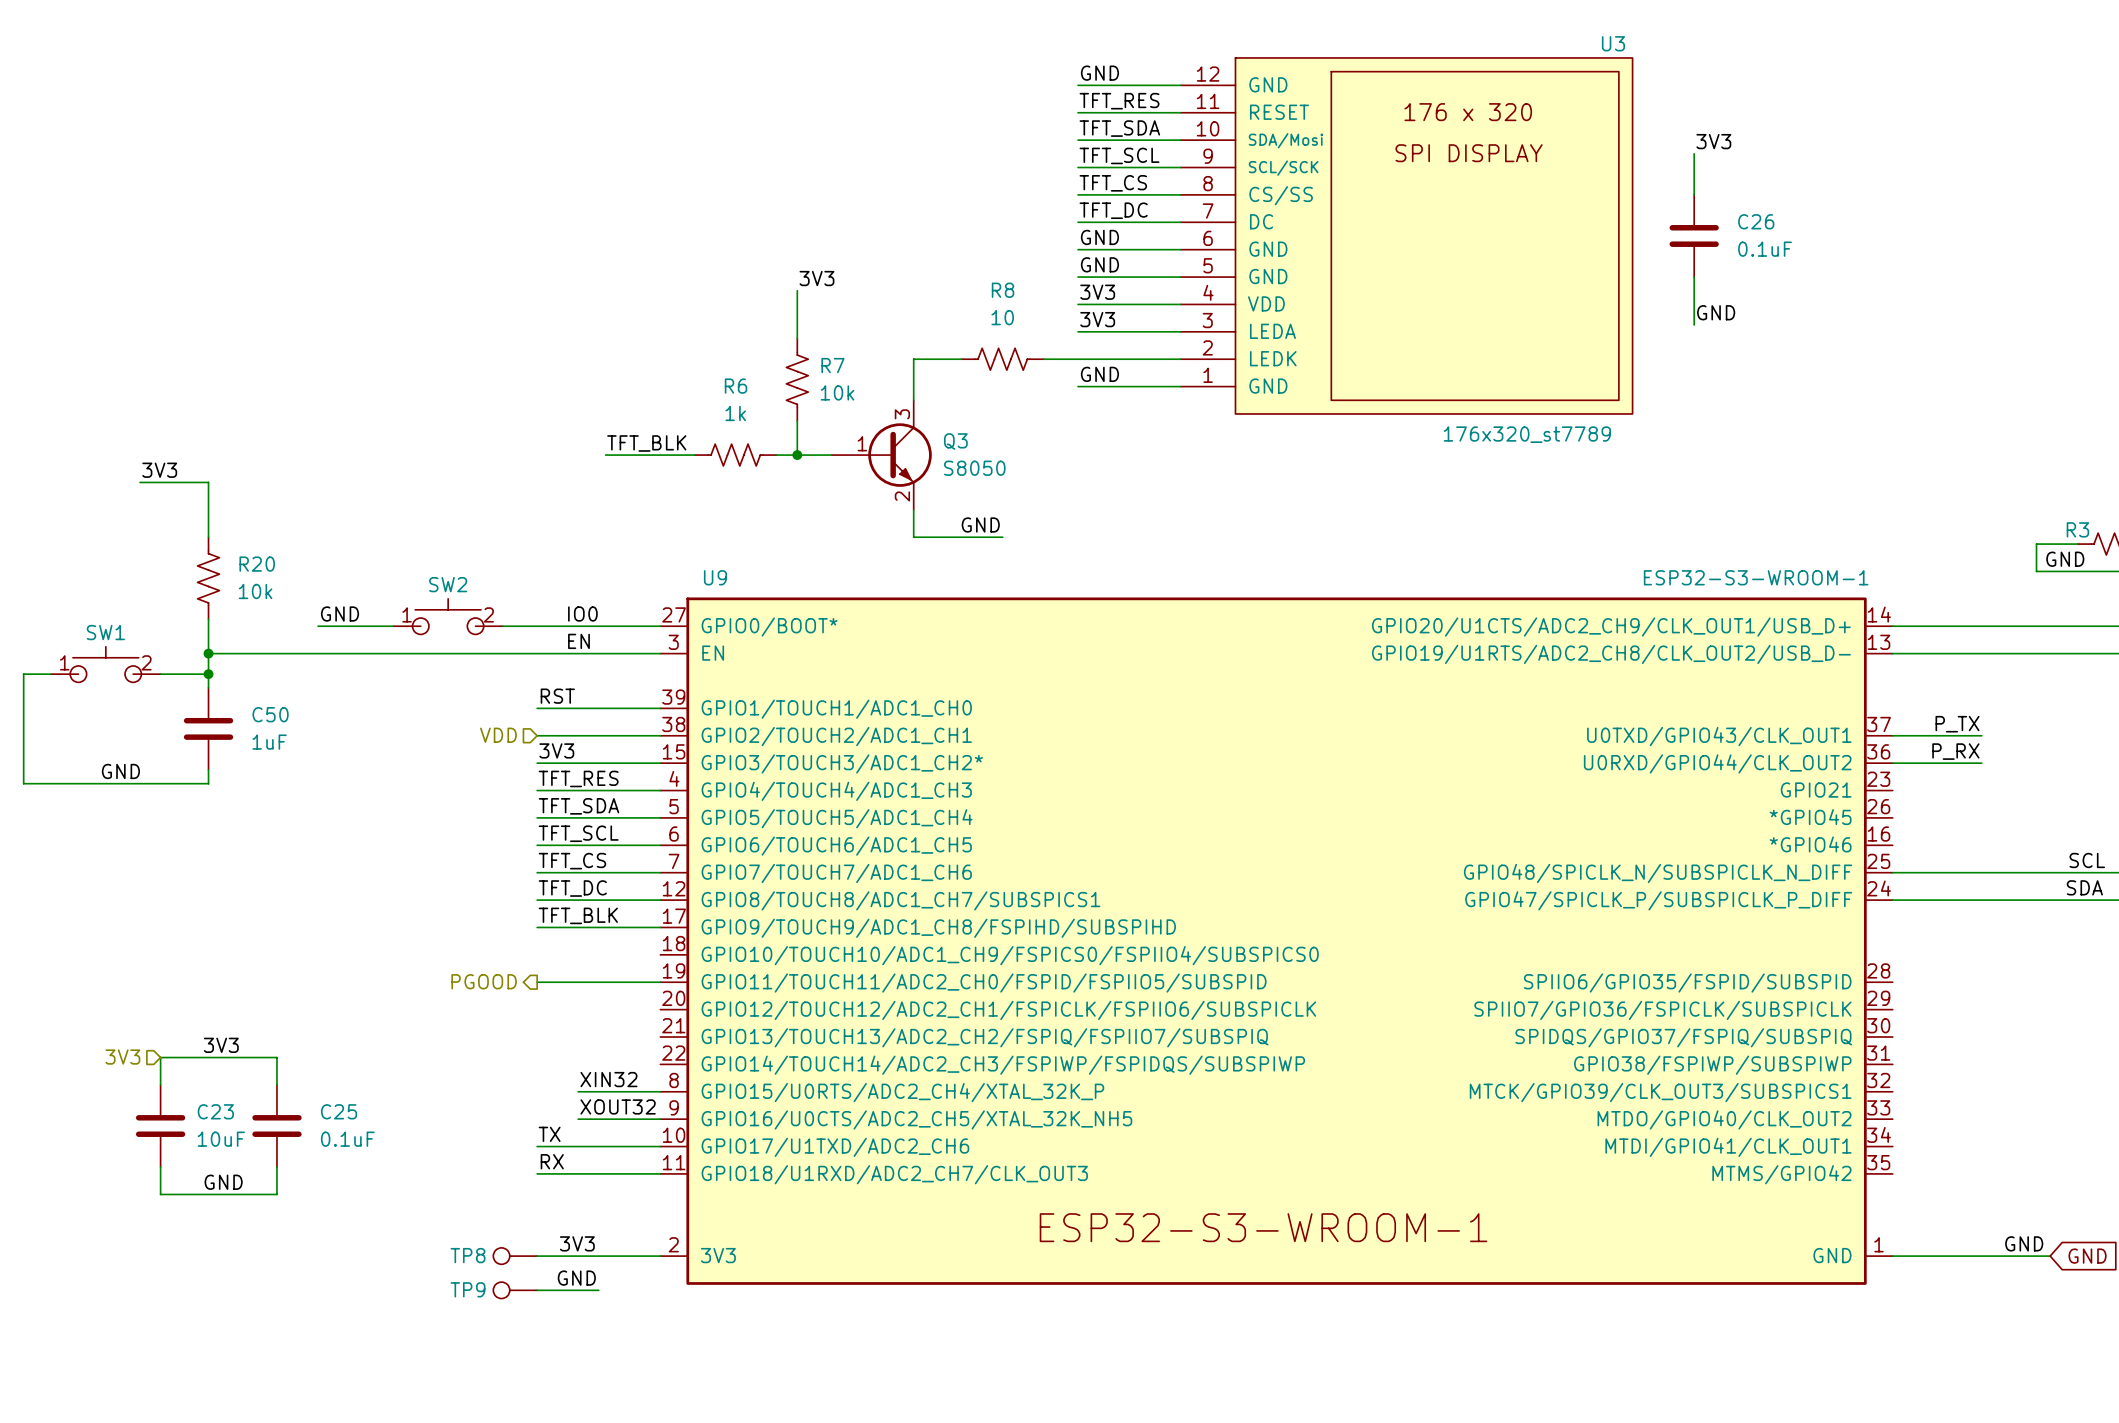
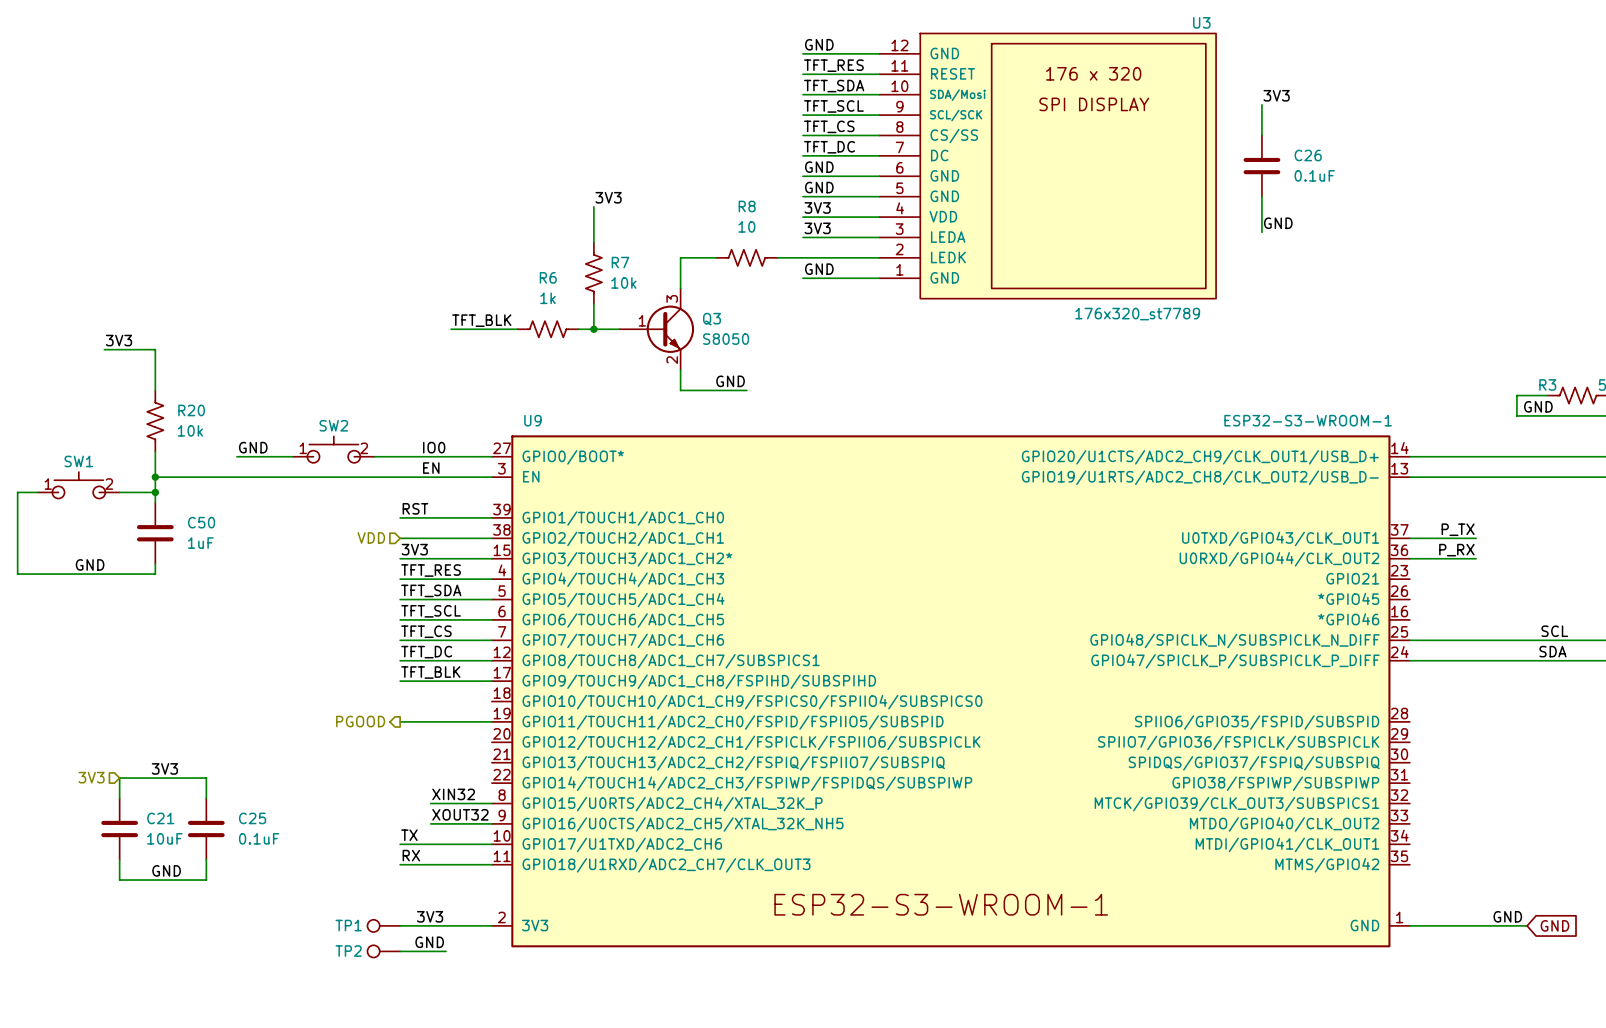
C23 name: C23 (215, 1111) -> C21 (160, 818)
TP8 name: TP8 (468, 1255) -> TP1 (348, 925)
TP9 name: TP9 (468, 1289) -> TP2 (348, 951)

